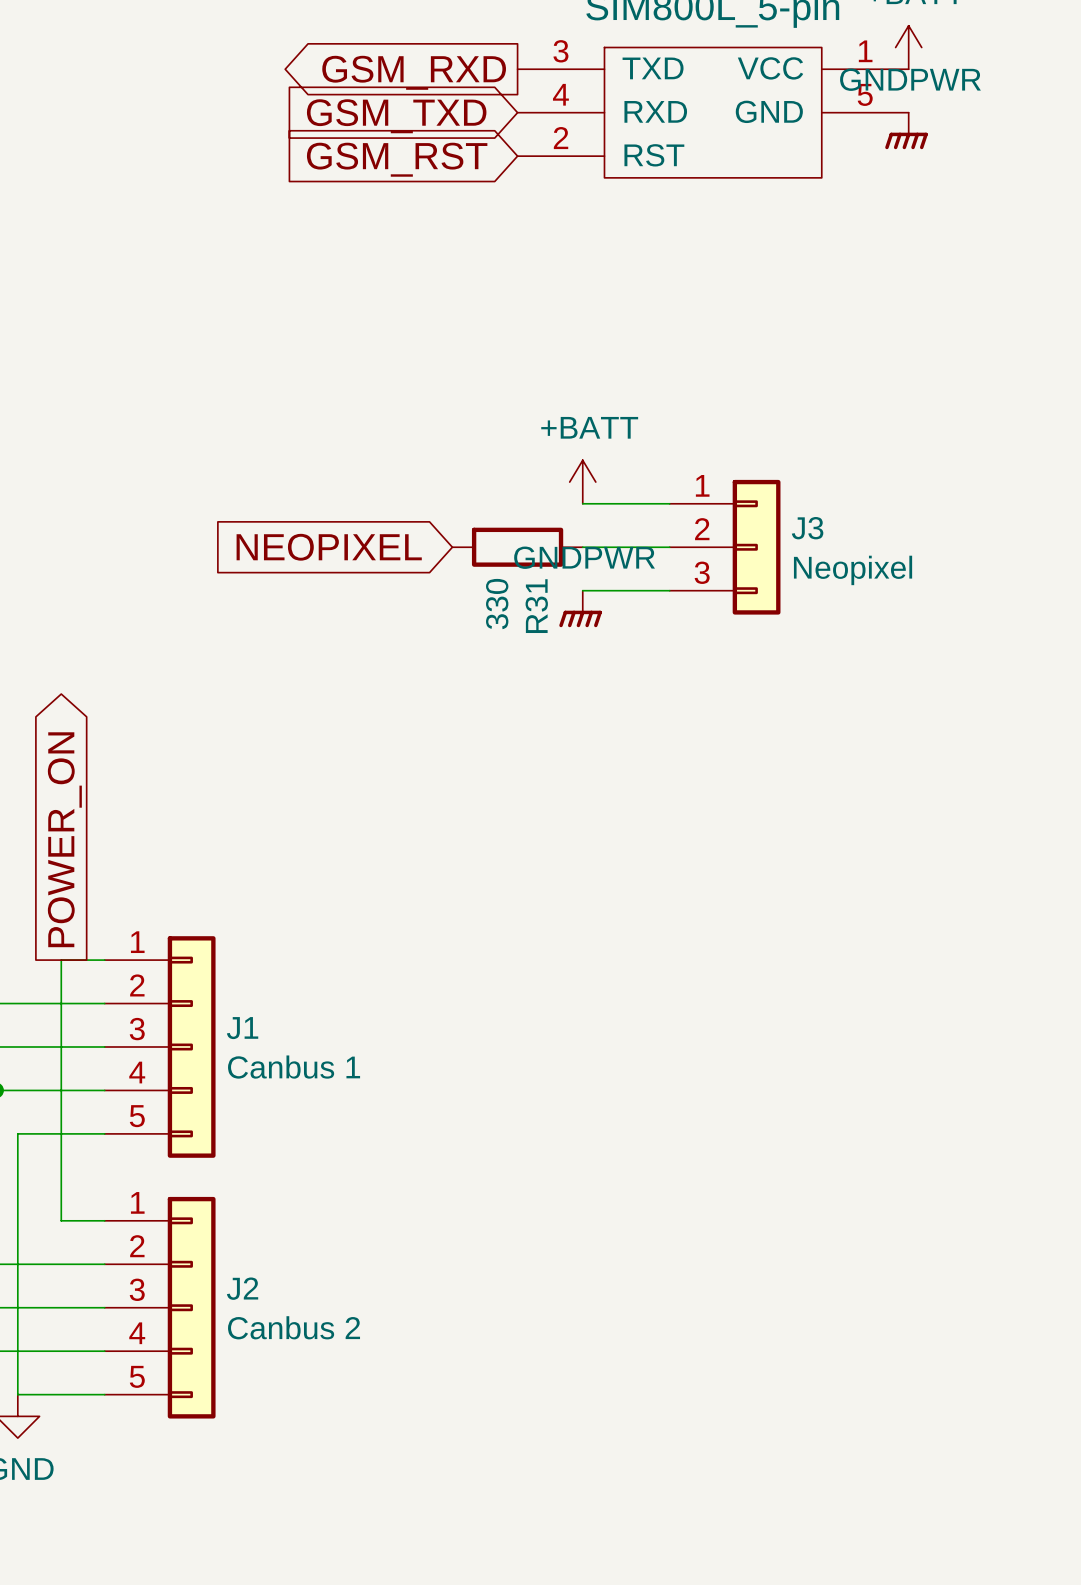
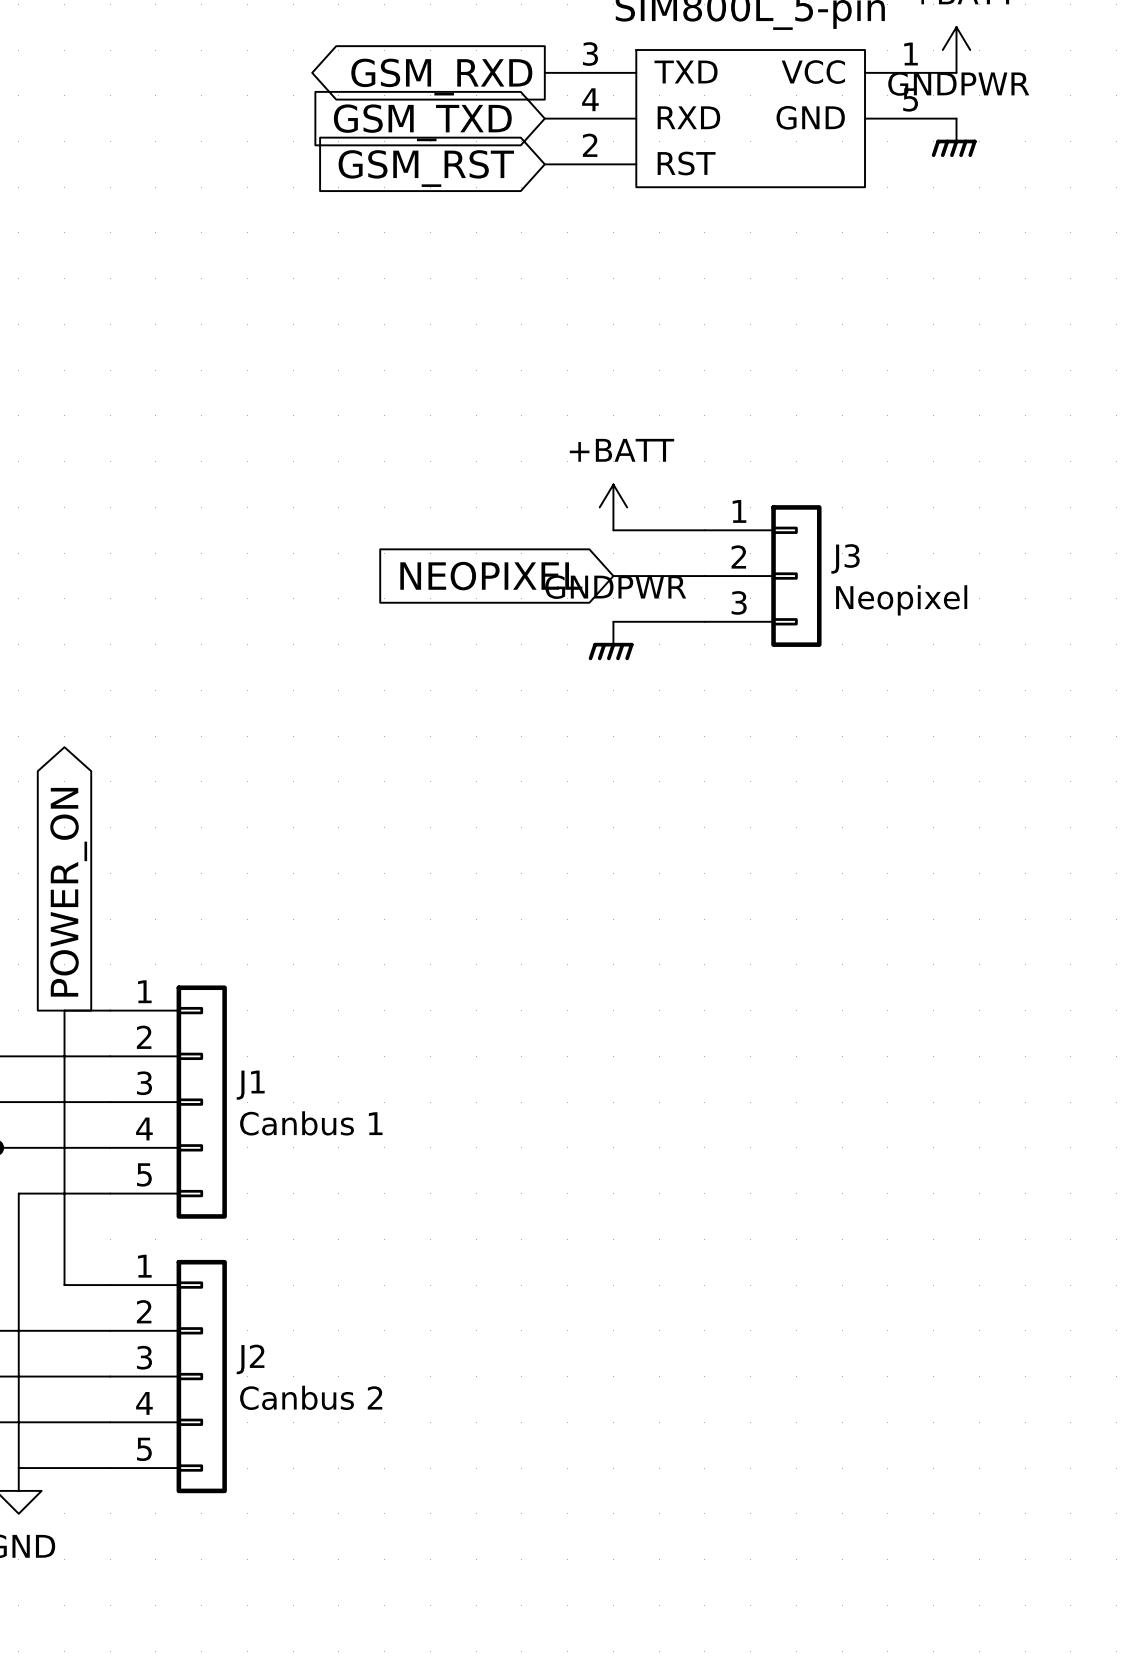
global label position: NEOPIXEL (329, 547) -> NEOPIXEL (491, 576)
R31: 330 (517, 547) -> none

